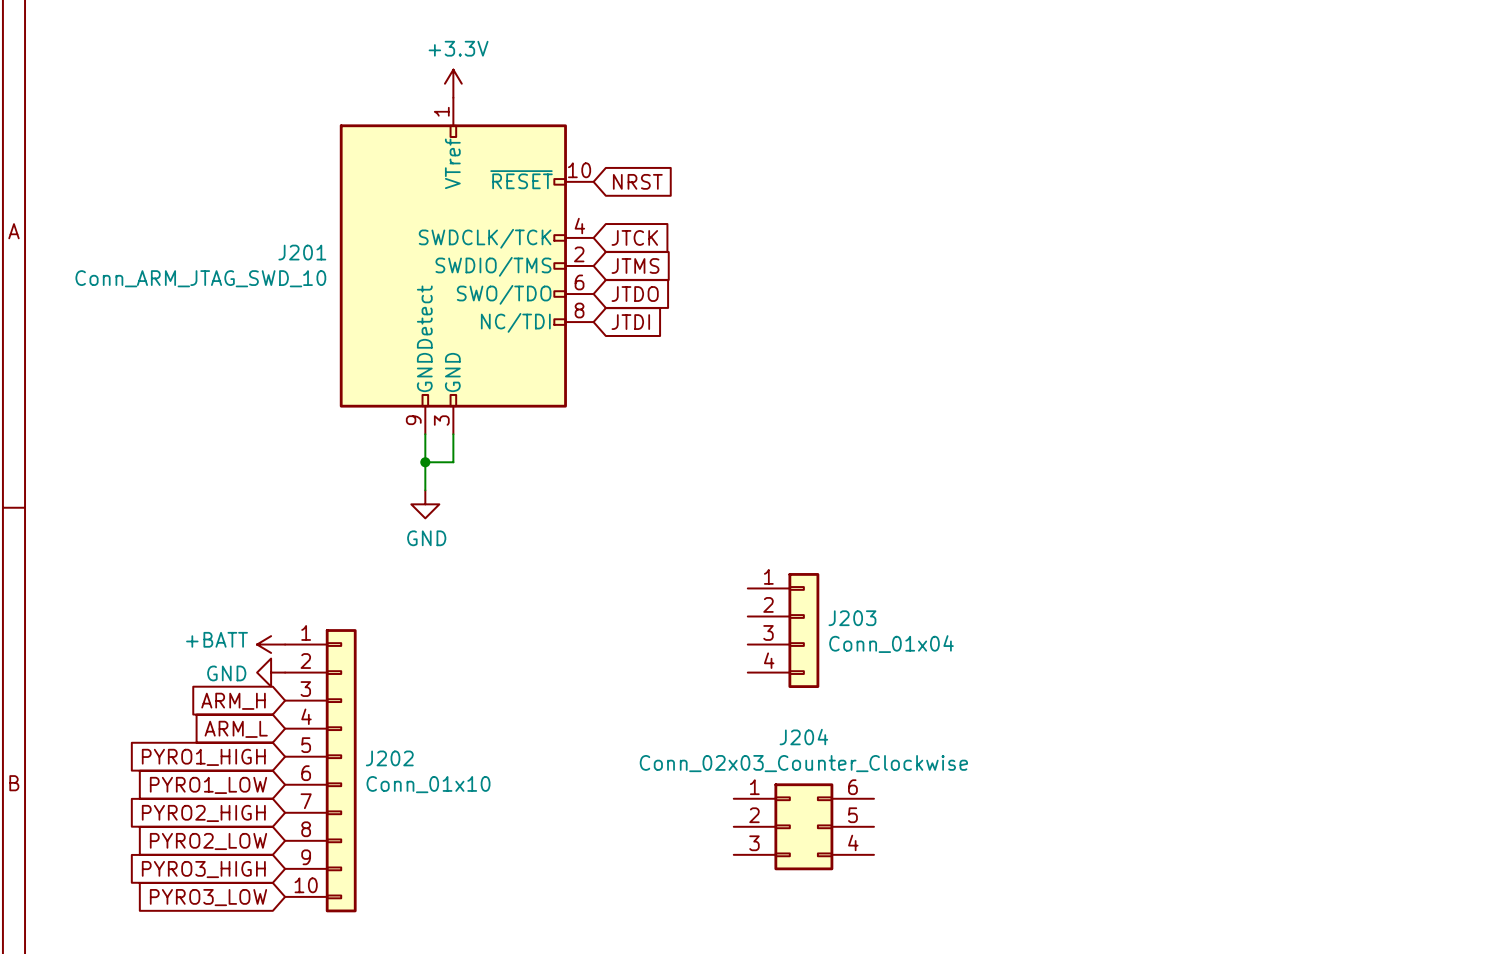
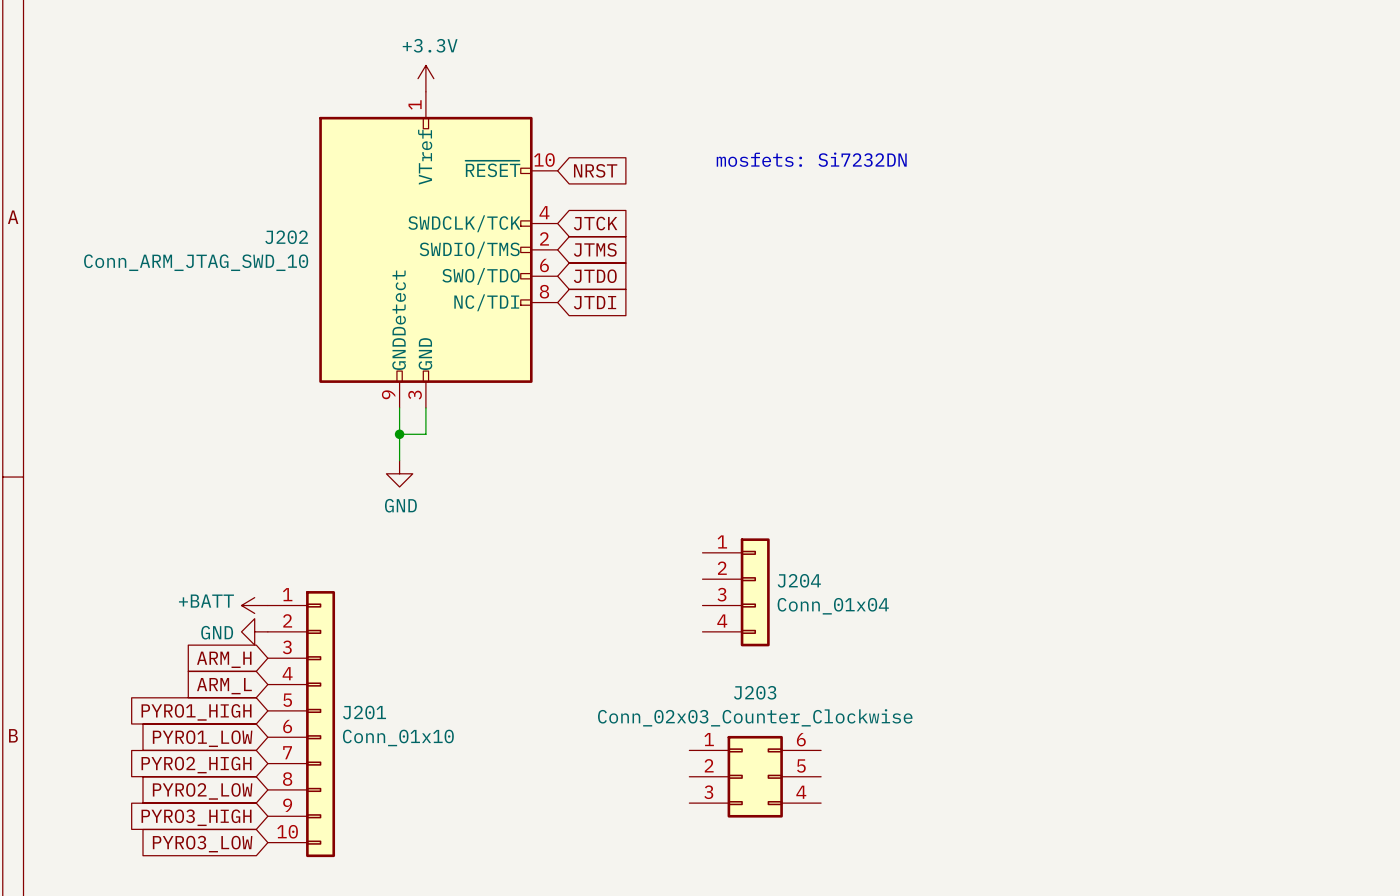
text: none -> mosfets: Si7232DN (811, 159)
J201 name: J201 (302, 252) -> J202 (286, 237)
J203 name: J203 (852, 618) -> J204 (799, 580)
J204 name: J204 (803, 737) -> J203 (755, 692)
J202 name: J202 (389, 758) -> J201 (364, 712)

